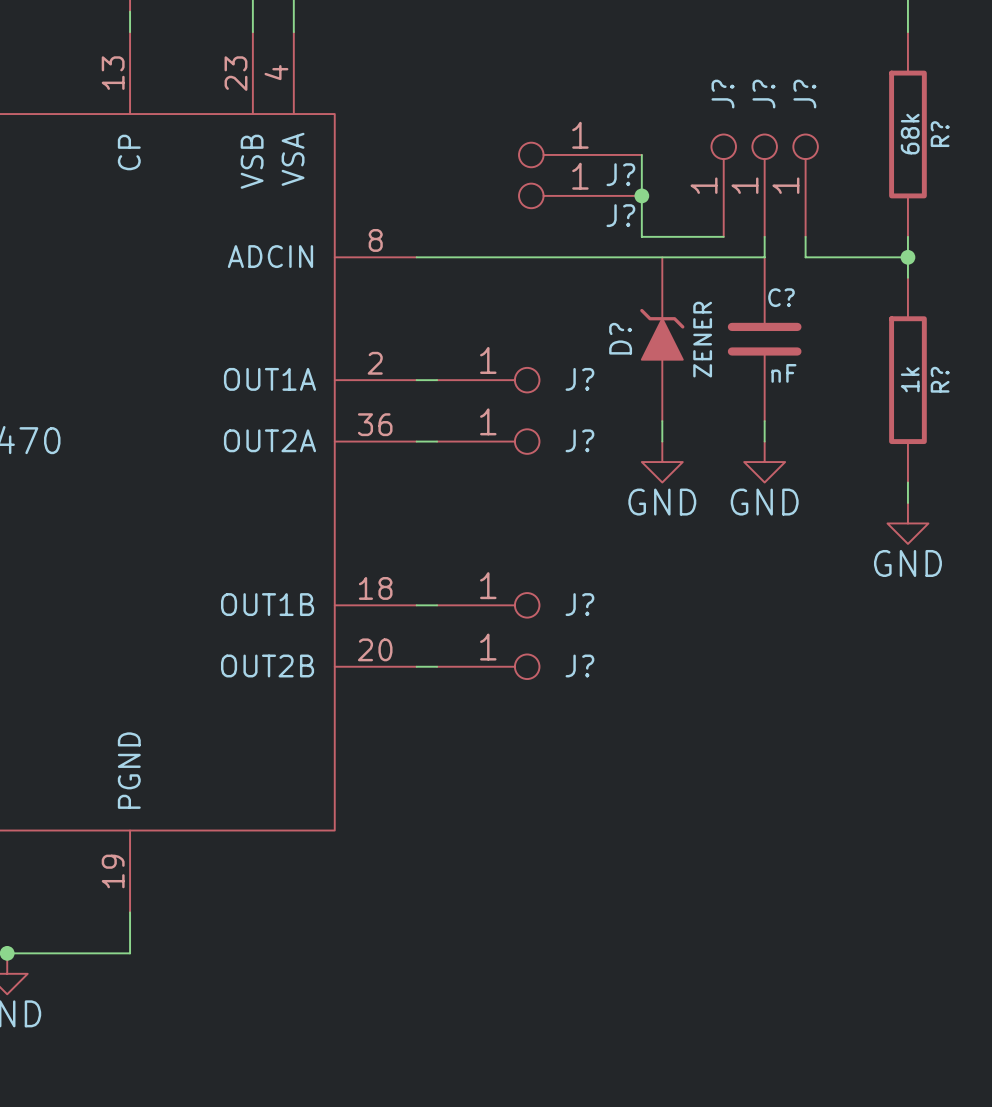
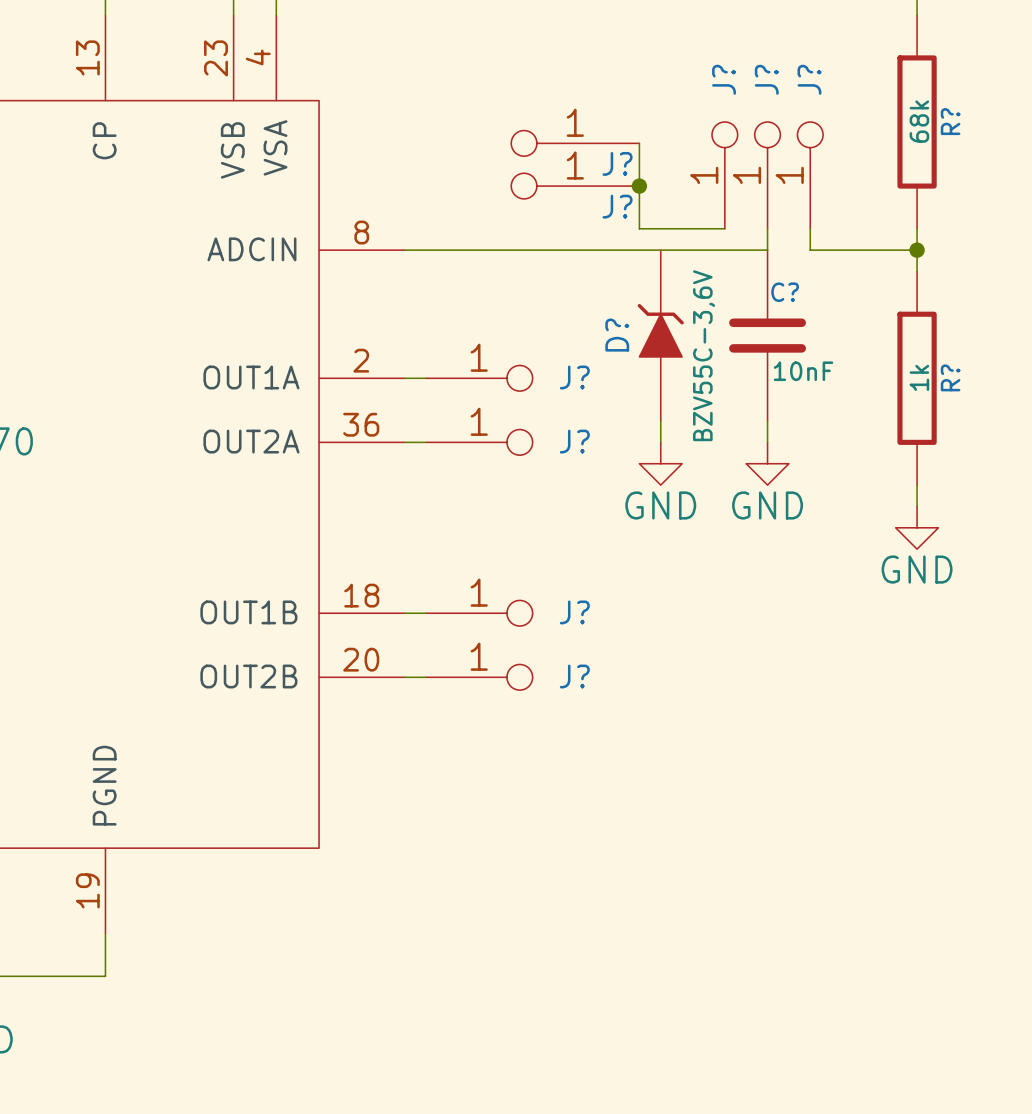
D? value: ZENER (702, 339) -> BZV55C-3,6V (704, 355)
C? value: nF (783, 373) -> 10nF (803, 371)

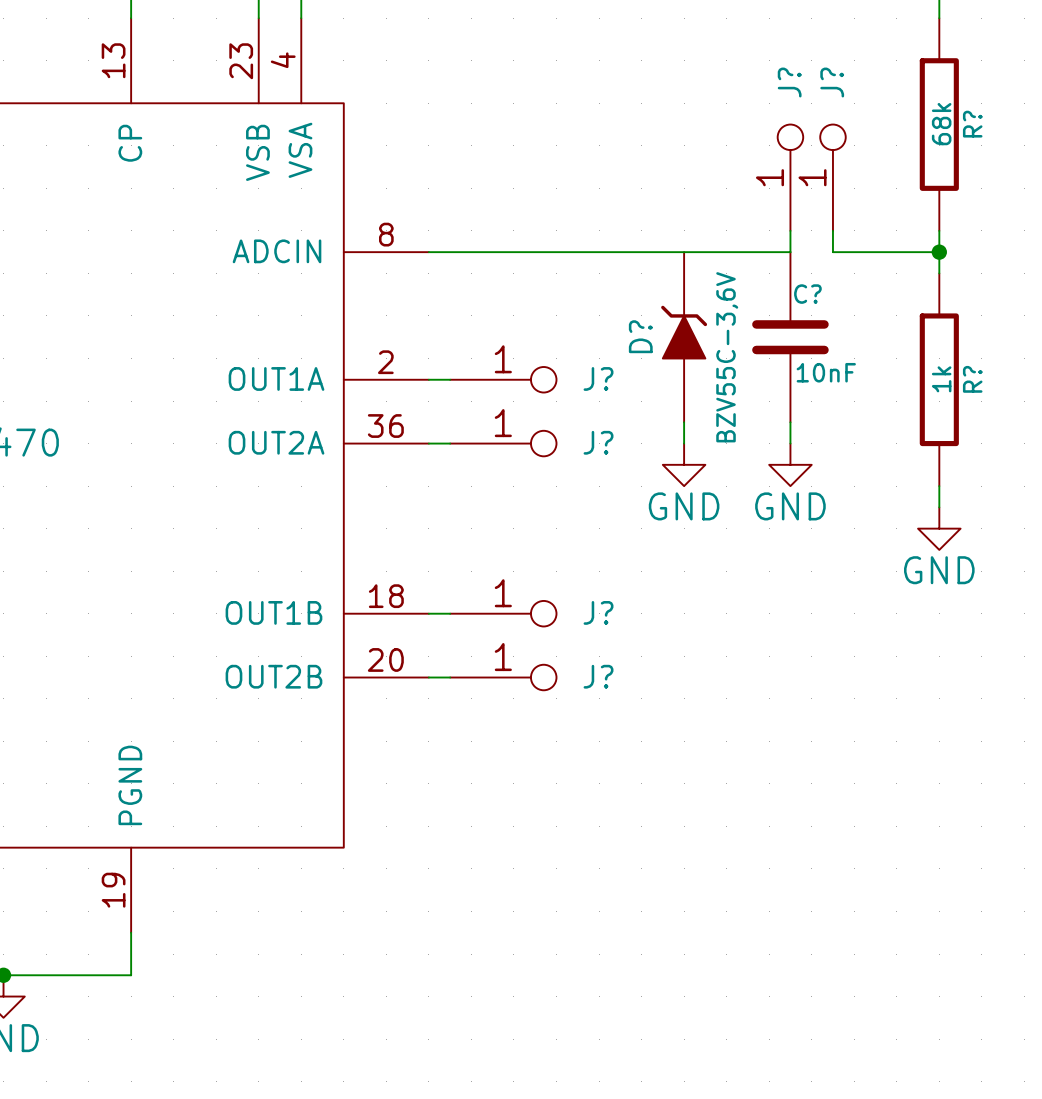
J?: (575, 143) -> none
wire: (639, 143) (639, 228) (724, 228) -> none
J?: (724, 175) -> none
J?: (575, 186) -> none
junction: (639, 186) -> none

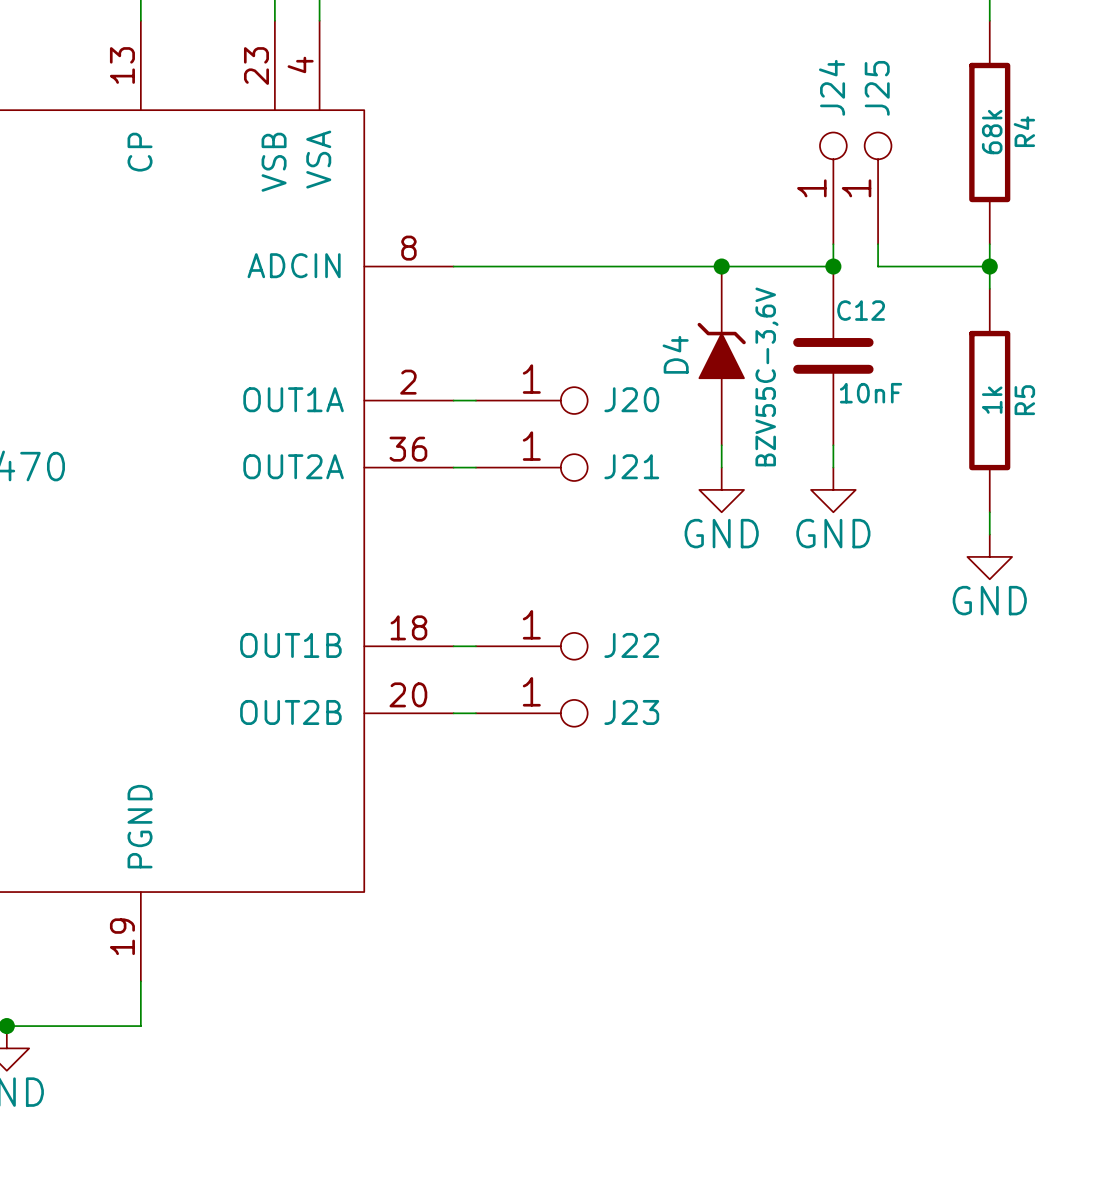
J? name: J? (789, 82) -> J24 (832, 87)
J? name: J? (832, 82) -> J25 (877, 88)
R? name: R? (972, 124) -> R4 (1024, 131)
junction: none -> (721, 266)
junction: none -> (833, 266)
C? name: C? (807, 294) -> C12 (861, 310)
D? name: D? (640, 336) -> D4 (675, 354)
J? name: J? (598, 378) -> J20 (631, 399)
R? name: R? (972, 379) -> R5 (1024, 400)
J? name: J? (598, 442) -> J21 (631, 466)
J? name: J? (598, 612) -> J22 (631, 645)
J? name: J? (598, 676) -> J23 (631, 712)

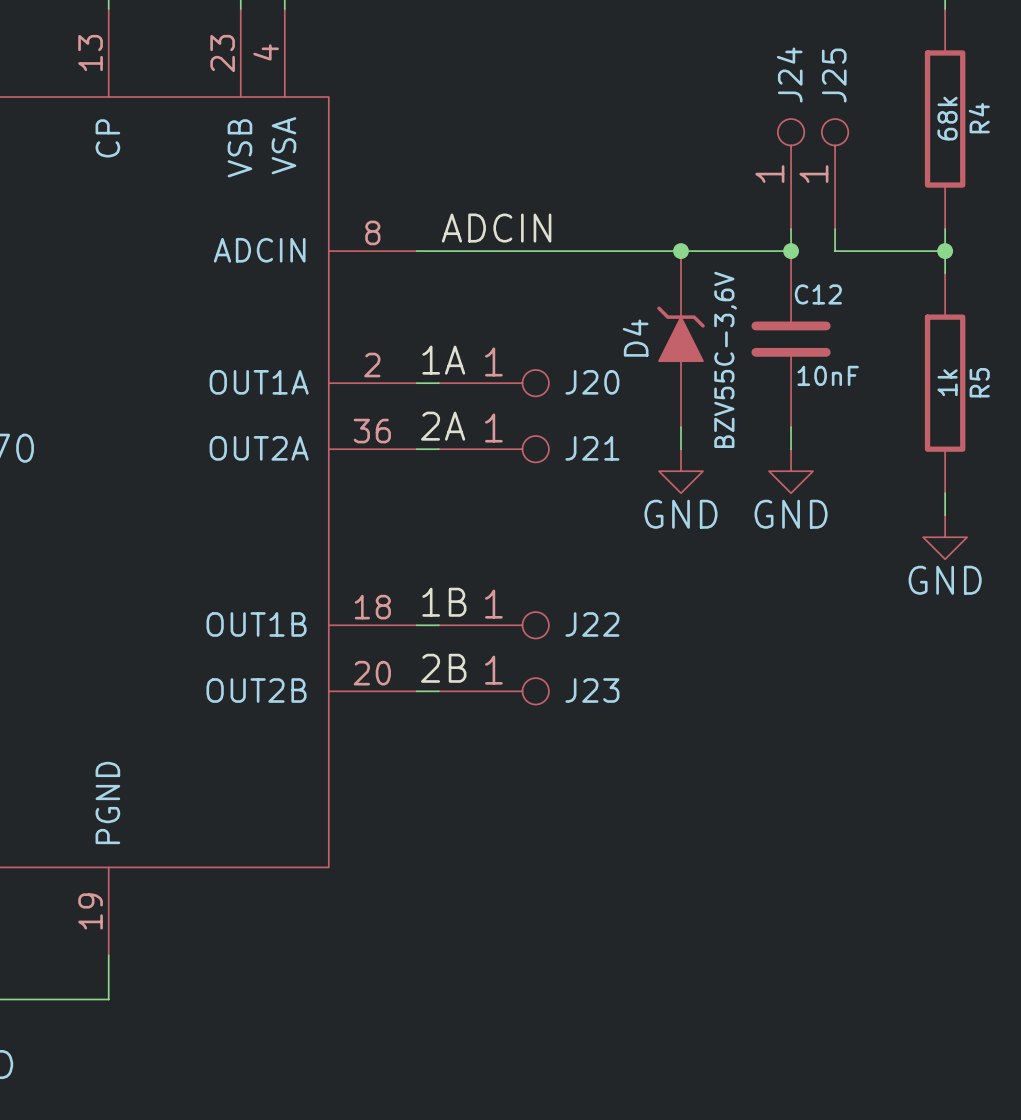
label: none -> ADCIN (496, 228)
label: none -> 1A (443, 360)
label: none -> 2A (443, 426)
label: none -> 1B (444, 602)
label: none -> 2B (443, 668)

